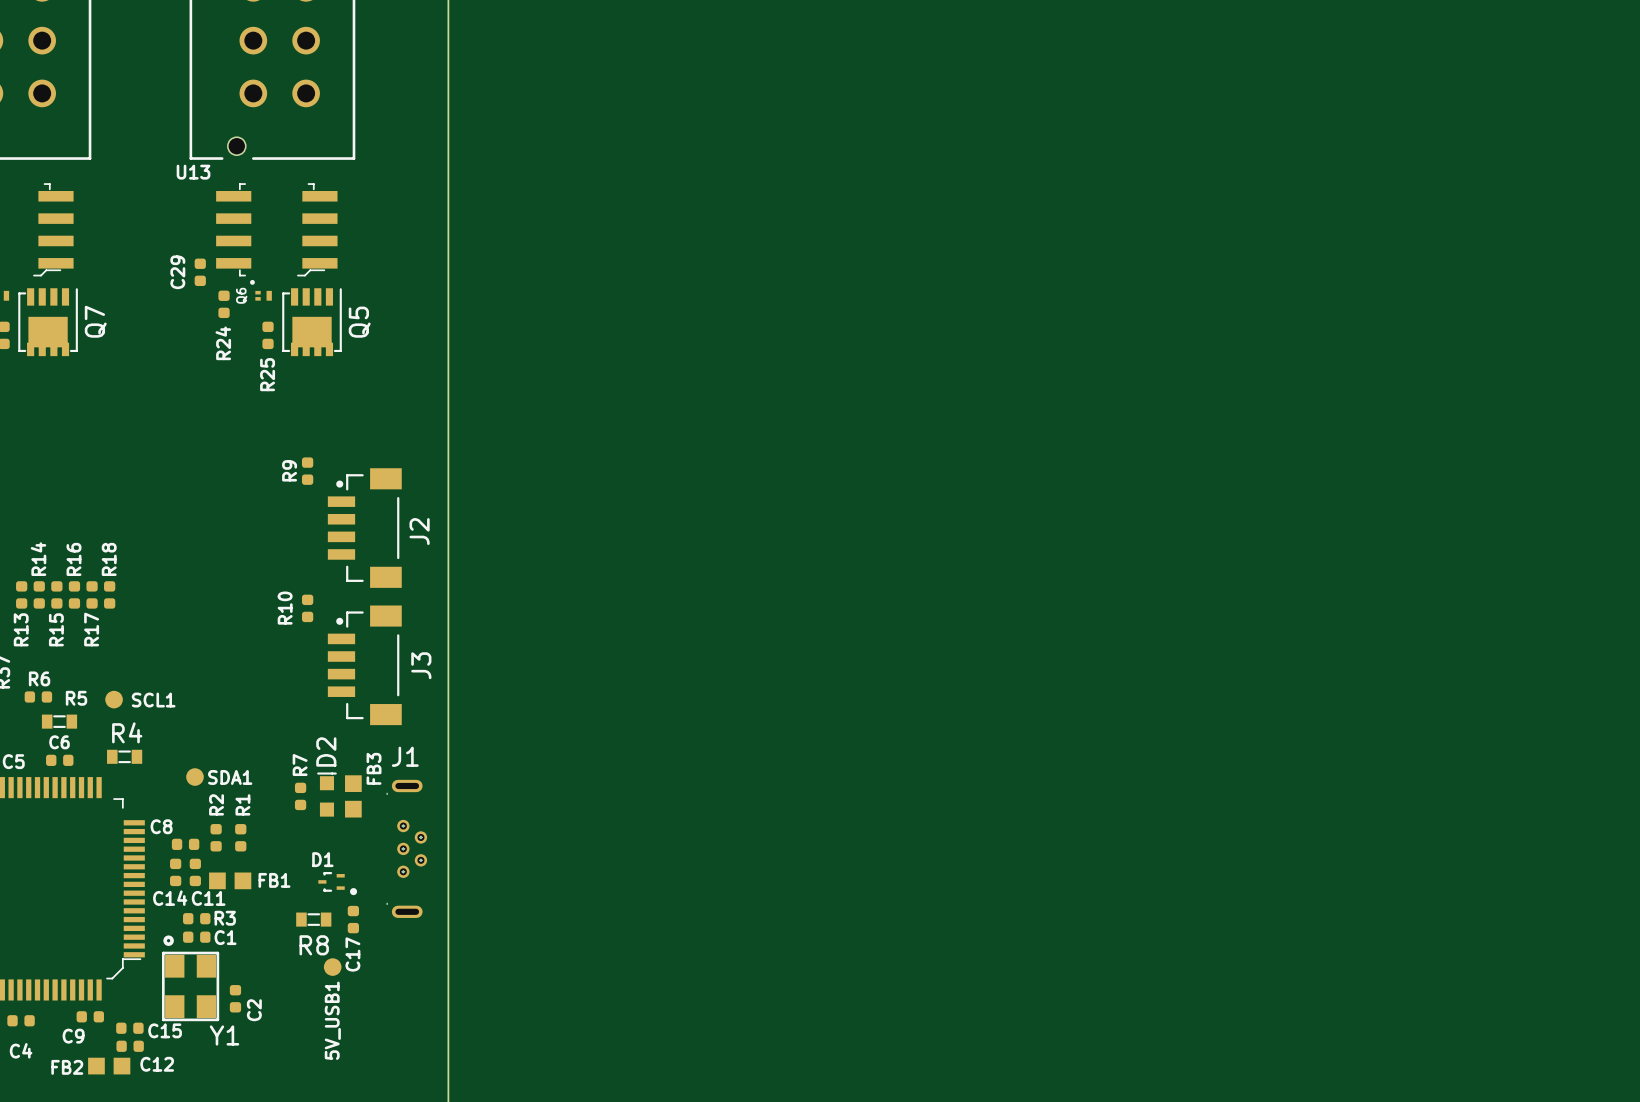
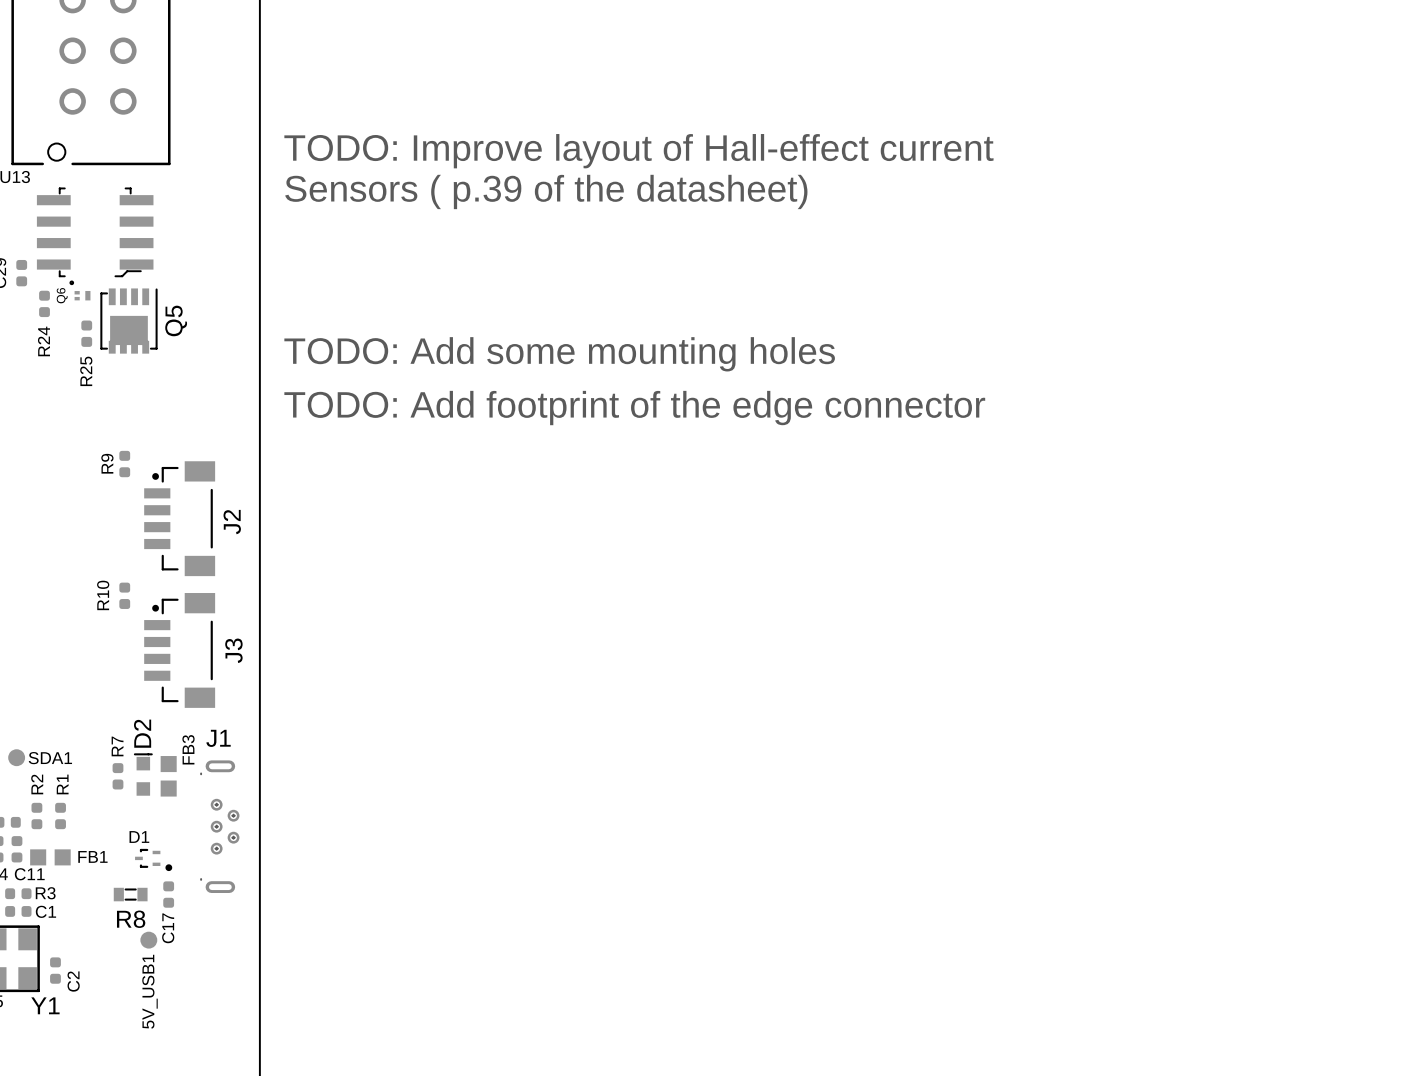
text: none -> TODO: Improve layout of Hall-effect current (638, 151)
text: none -> Sensors ( p.39 of the datasheet) (546, 191)
text: none -> TODO: Add some mounting holes (559, 354)
text: none -> TODO: Add footprint of the edge connector (634, 408)

